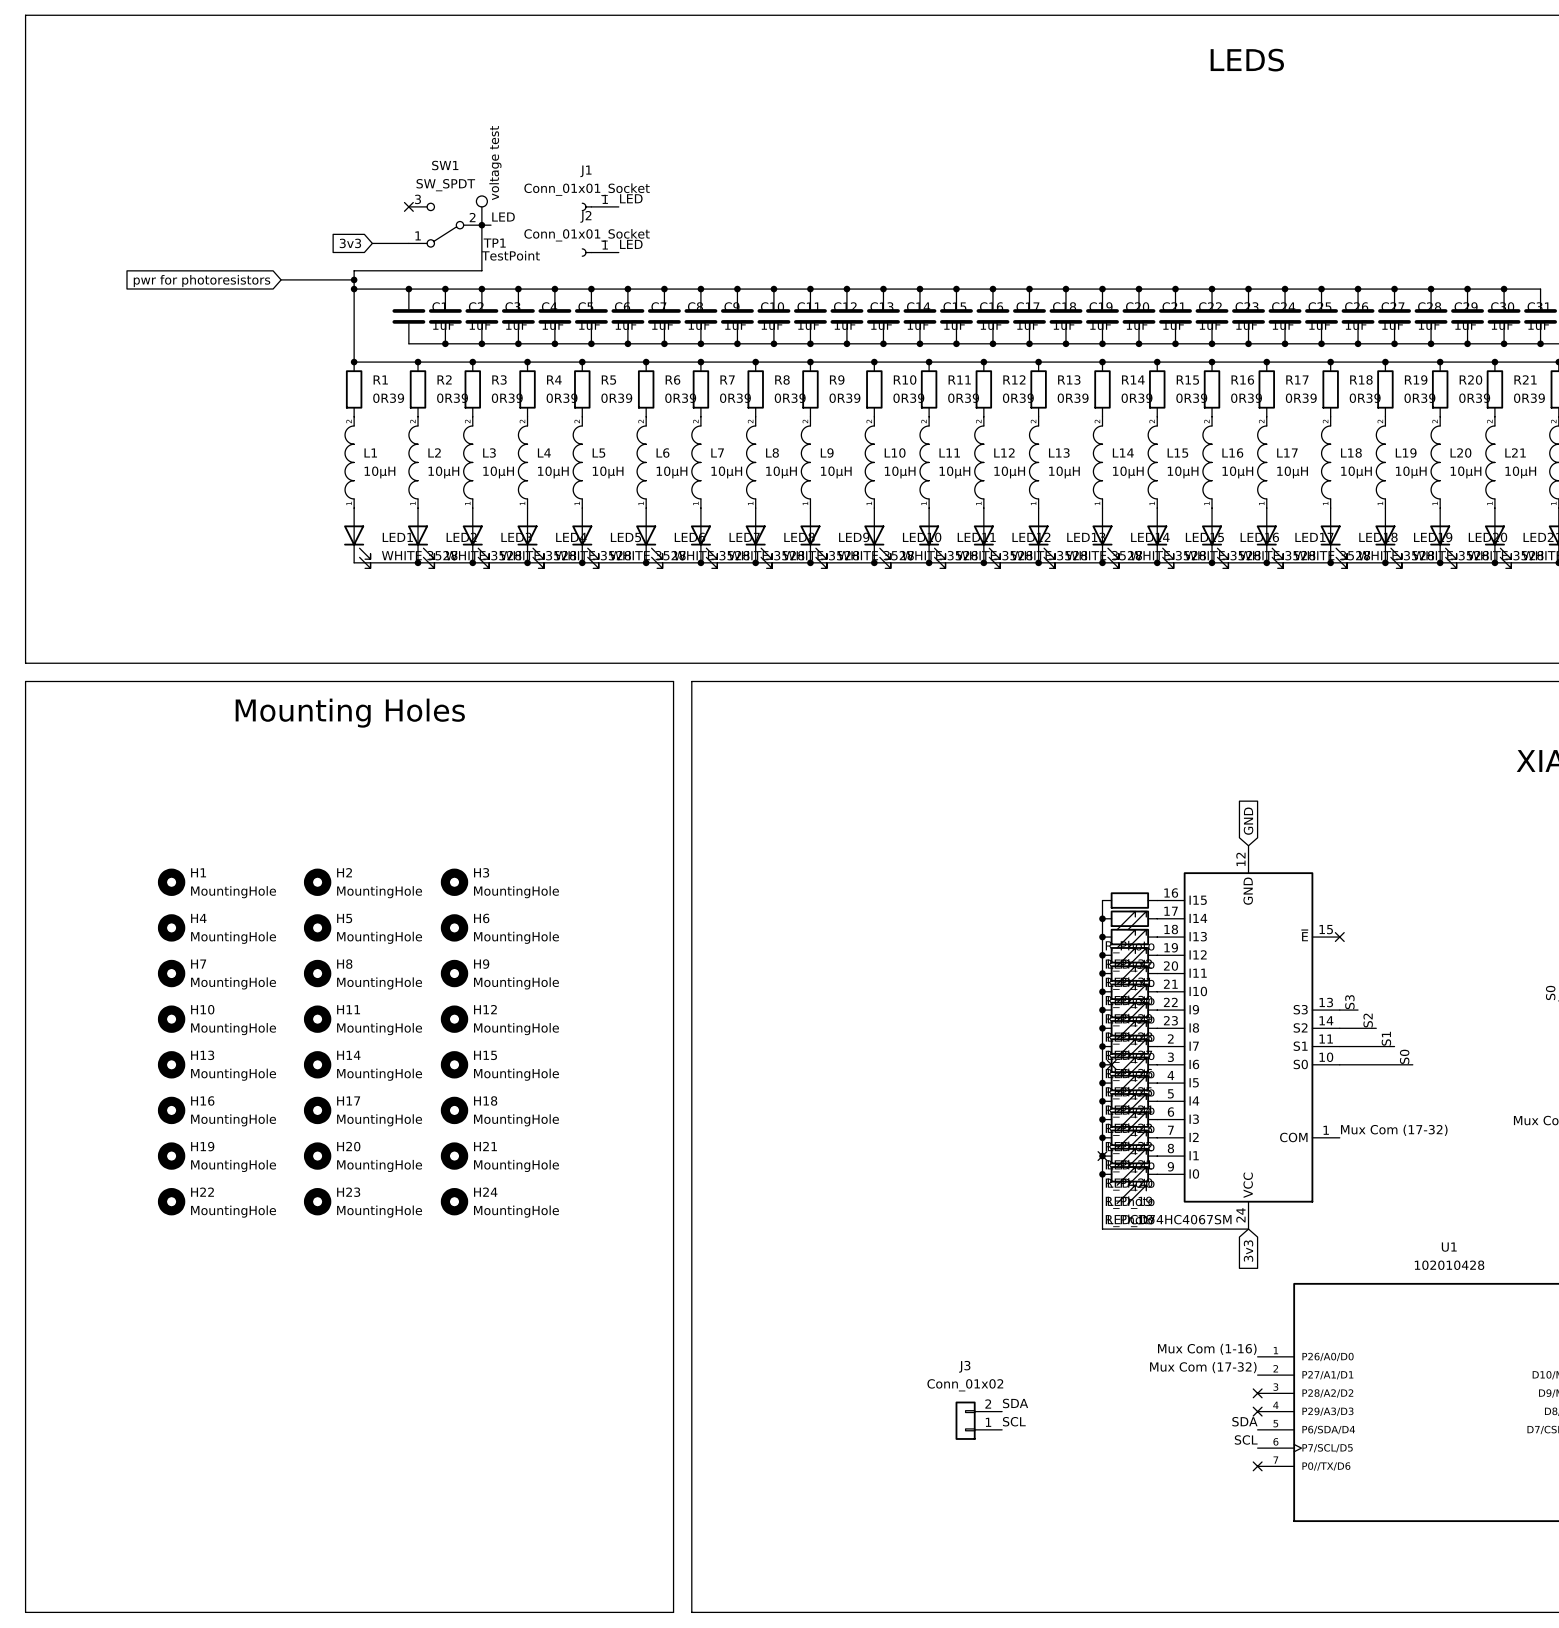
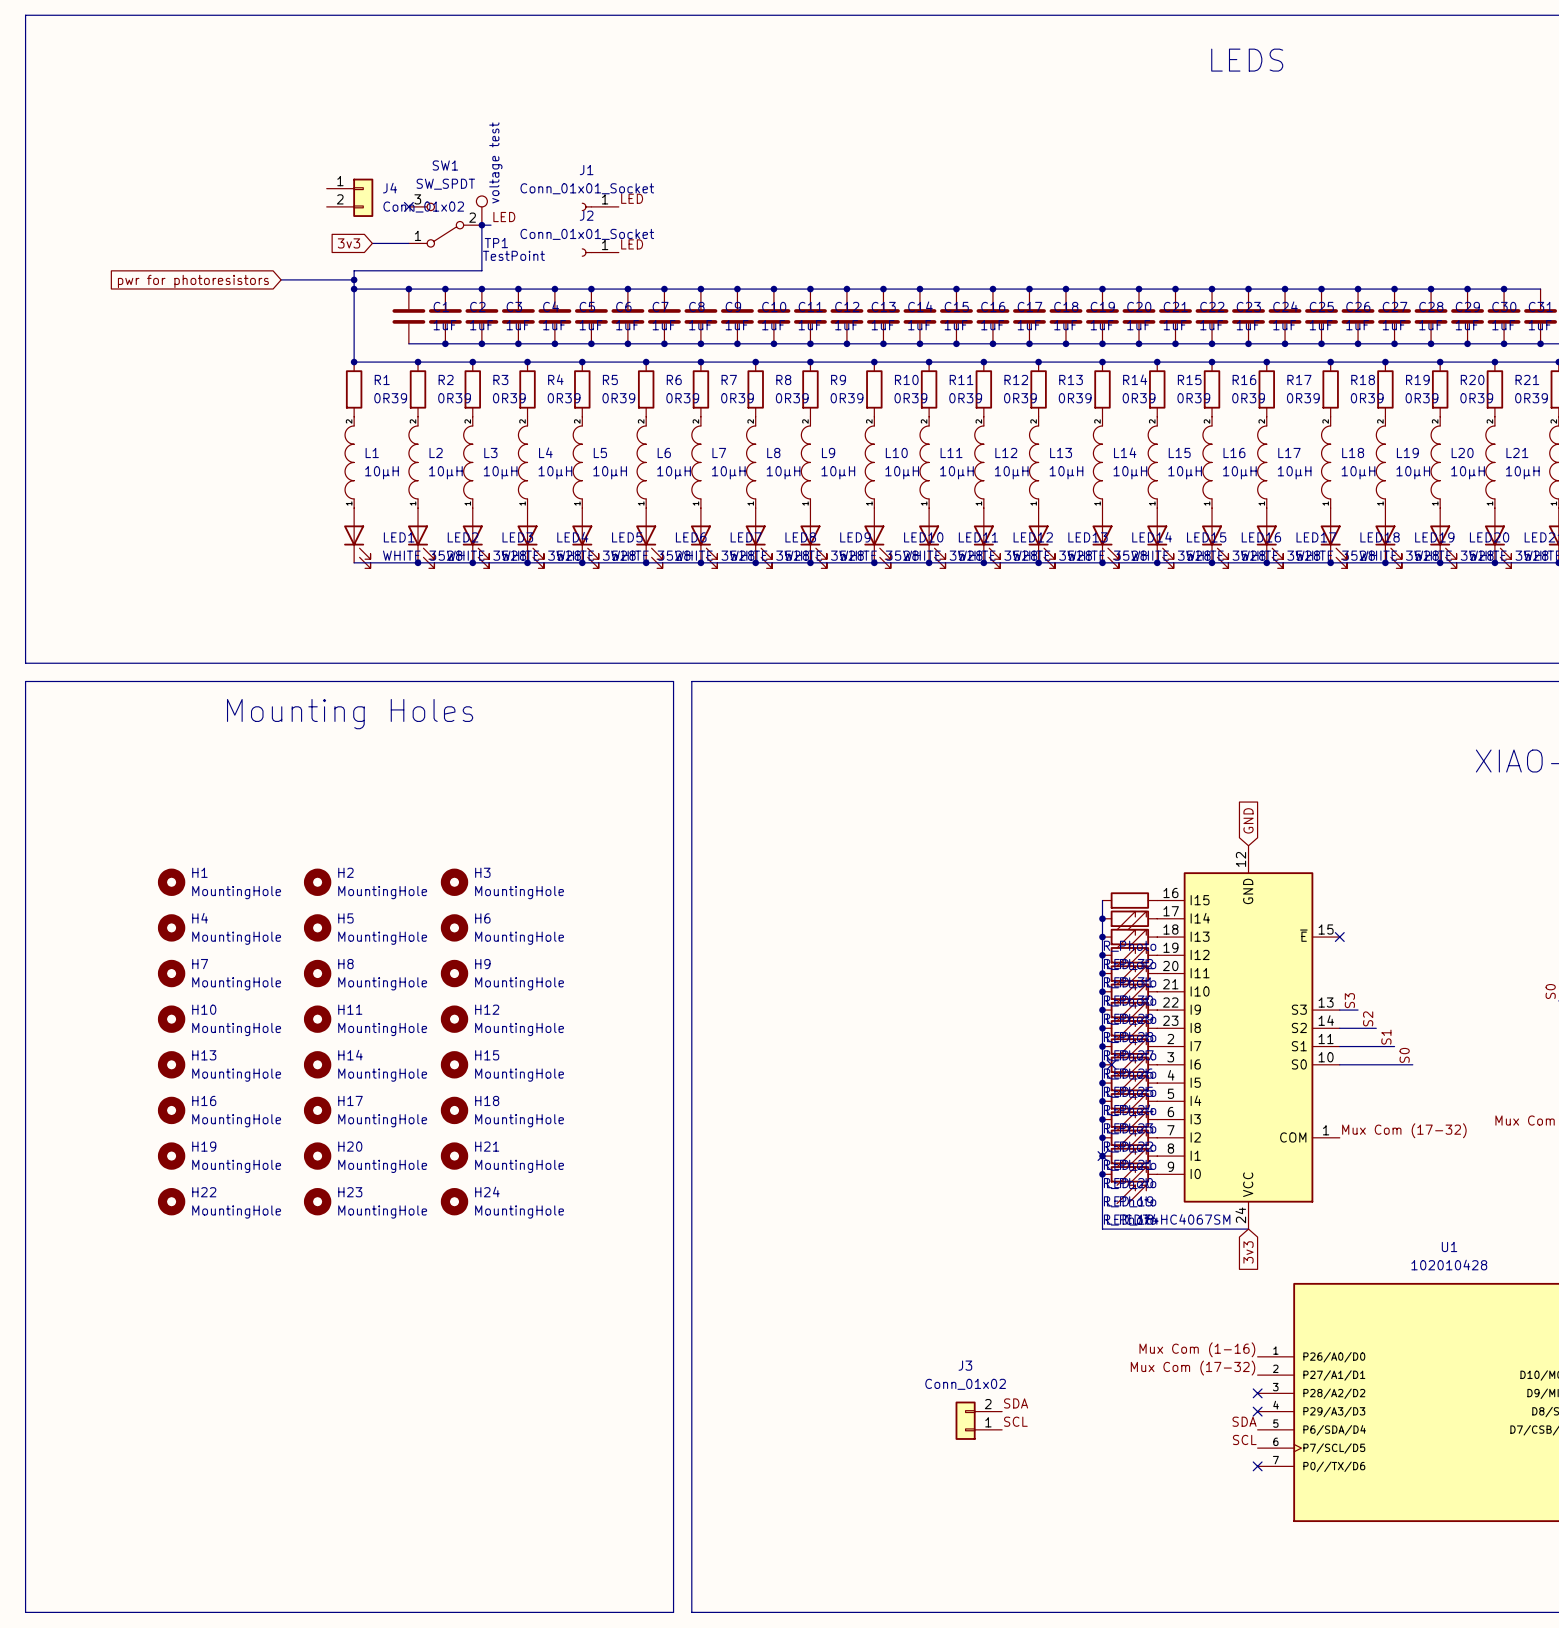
J4: none -> Conn_01x02 (350, 197)

